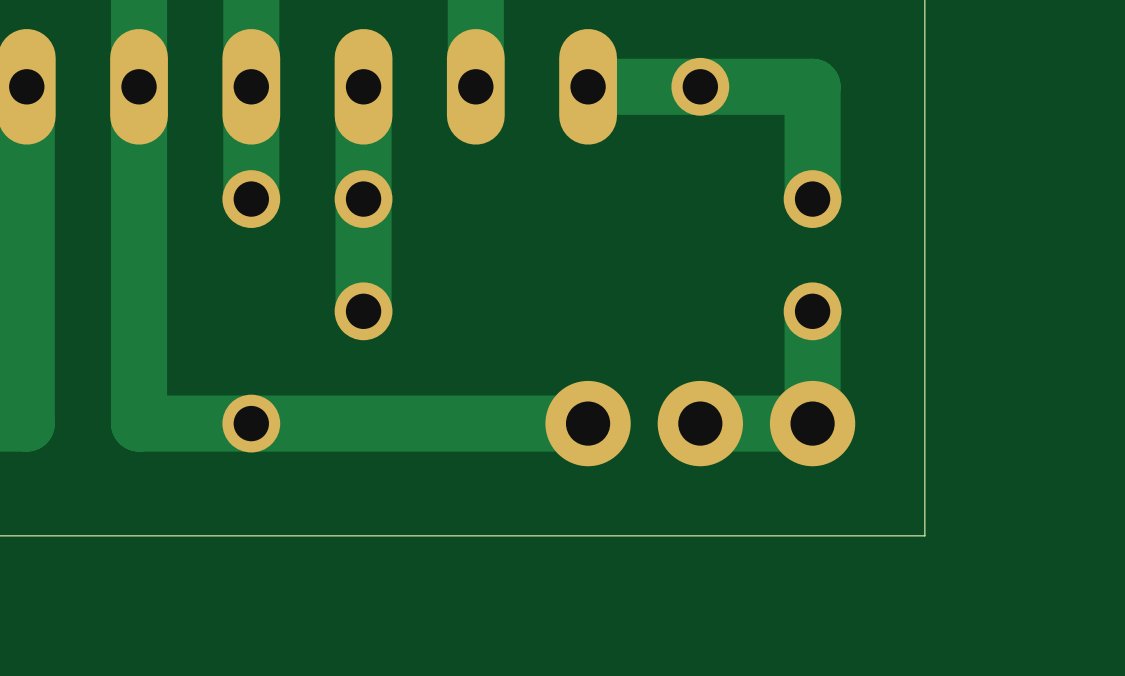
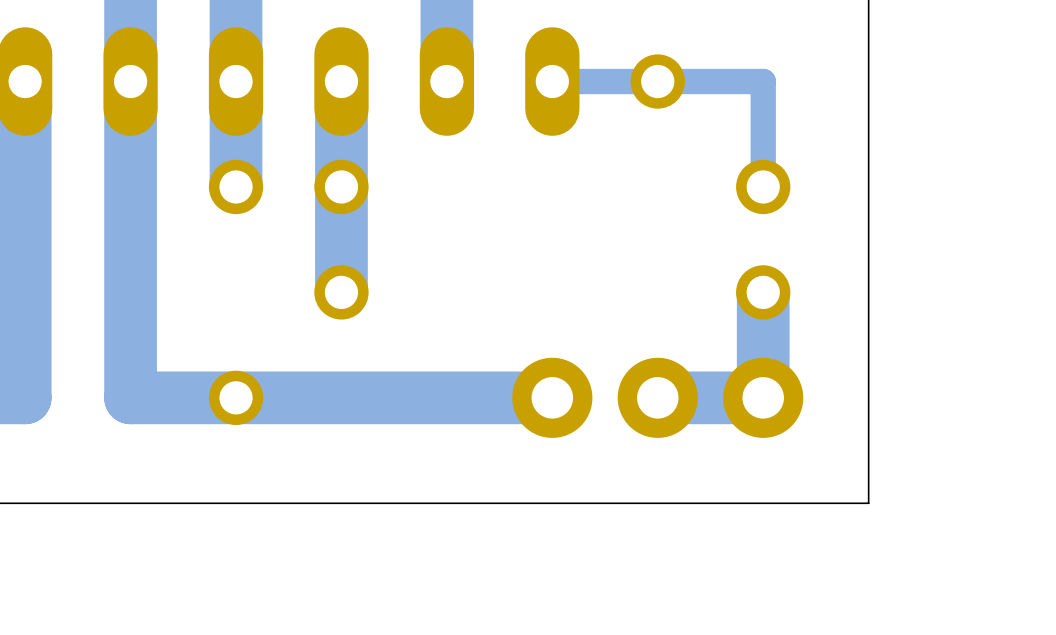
track width: thick (588, 86) (812, 86) (812, 199) -> thin (552, 81) (763, 81) (763, 186)

